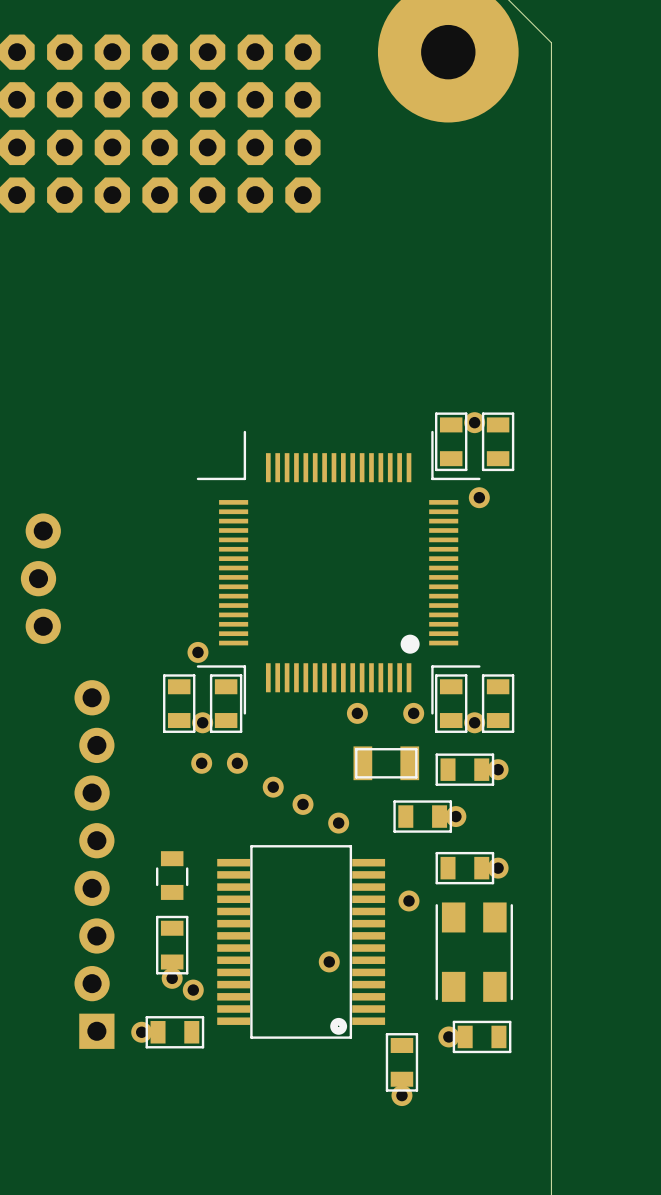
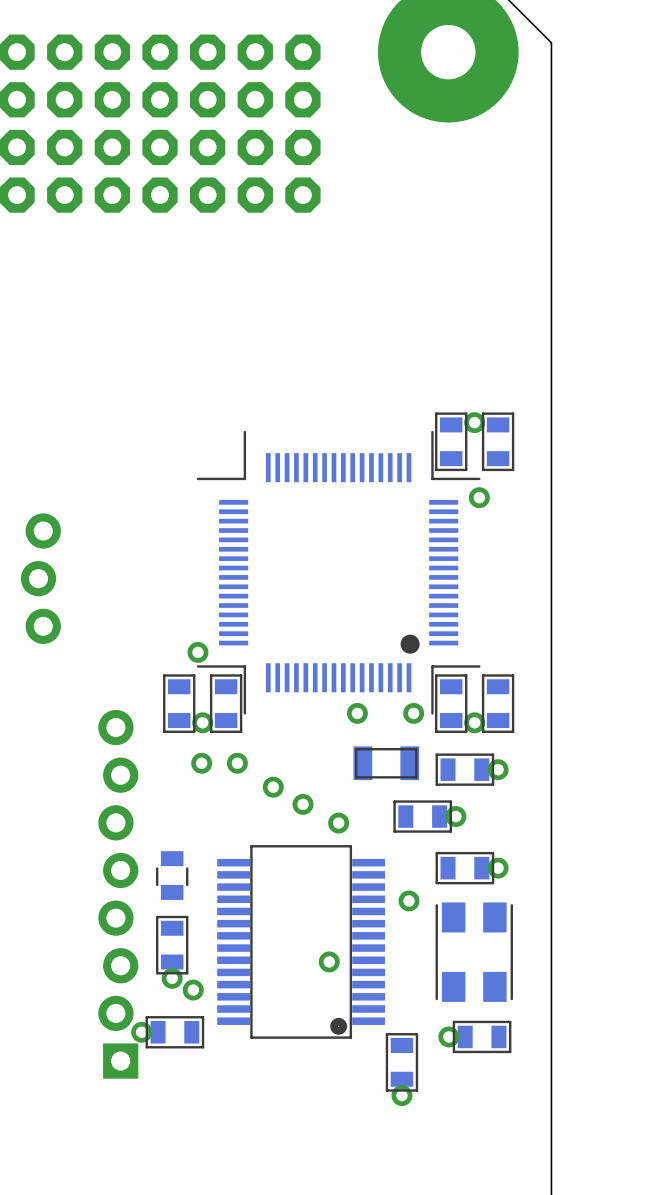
part position: (94, 864) -> (118, 894)

